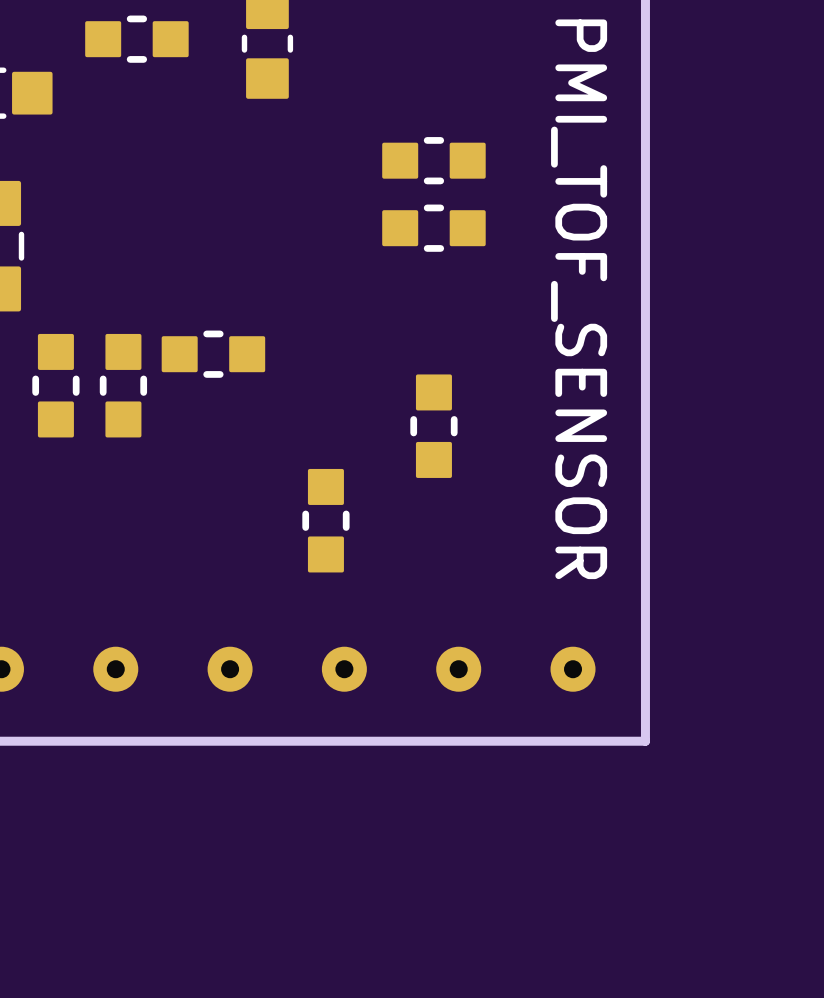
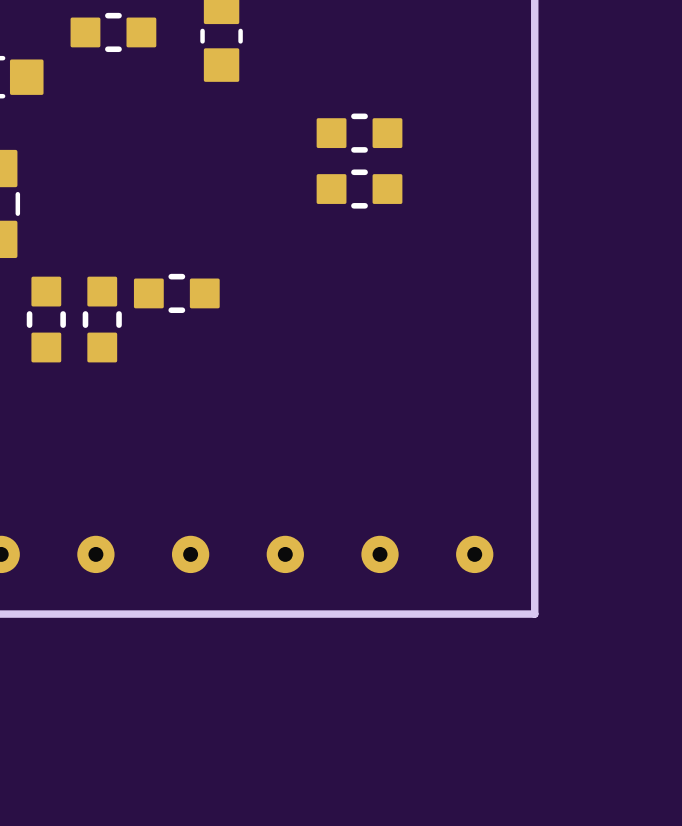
text: PMI_TOF_SENSOR (579, 299) -> none
part: (433, 426) -> none
part: (325, 520) -> none

